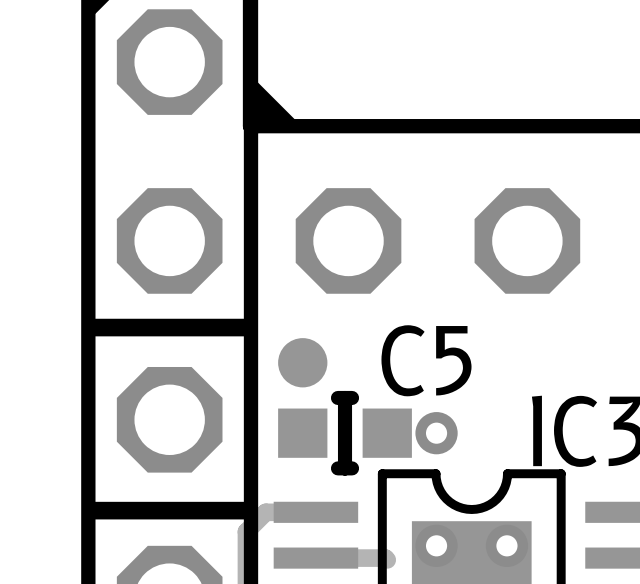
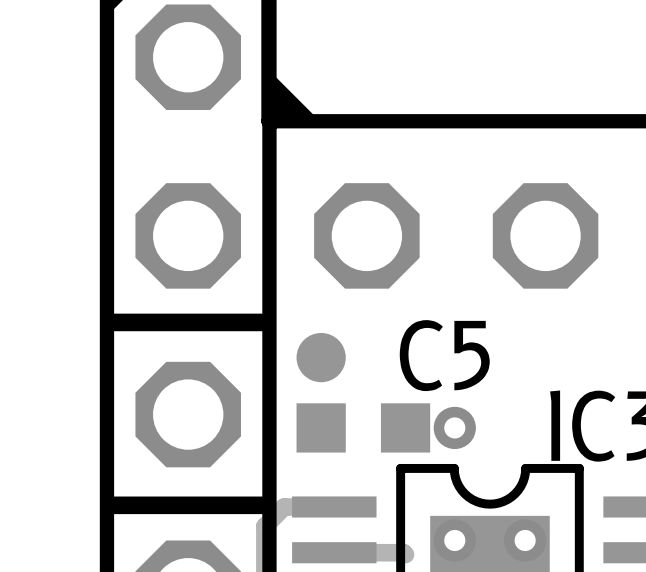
C5 footprint: [278, 390, 412, 476] -> [296, 403, 431, 453]

